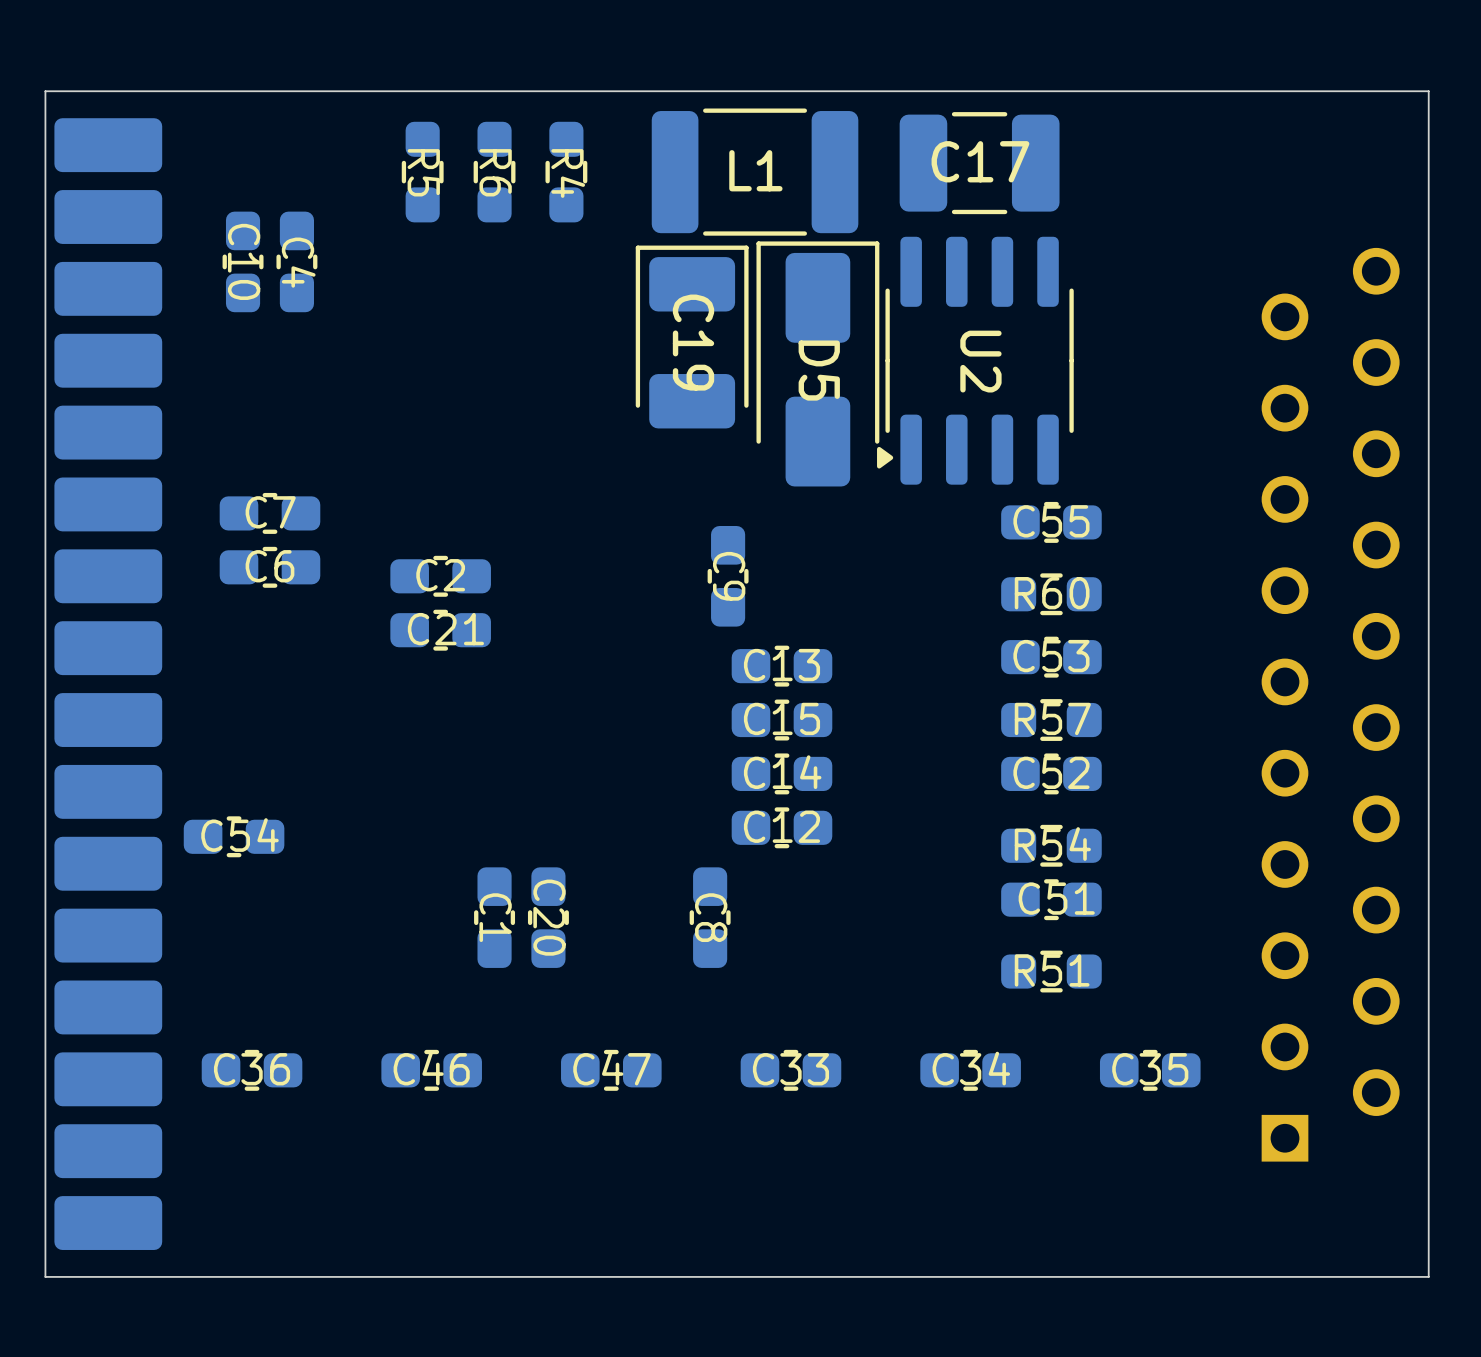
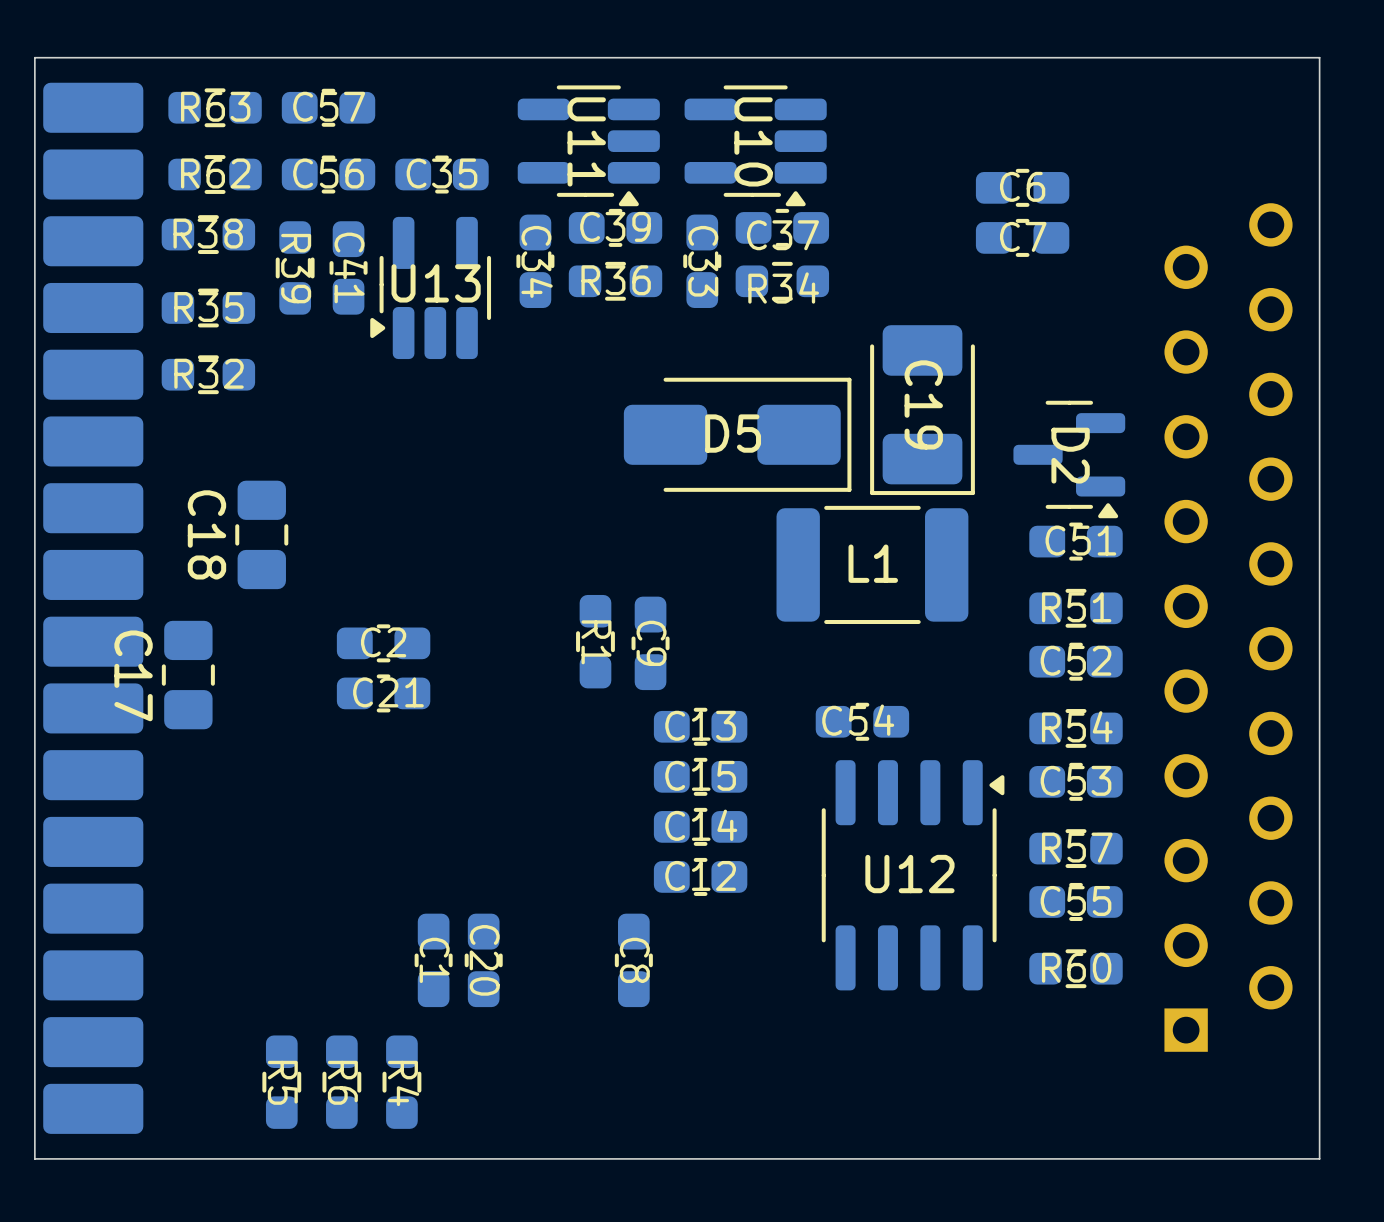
C17 footprint: [899, 112, 1060, 215] -> [161, 620, 215, 730]
R63: none -> (215, 107)
C57: none -> (328, 107)
R5 position: (422, 172) -> (281, 1082)
R6 position: (494, 172) -> (341, 1082)
R4 position: (566, 172) -> (401, 1082)
L1 position: (755, 172) -> (872, 564)
U11: none -> (588, 145)
U10: none -> (755, 145)
R62: none -> (215, 174)
C56: none -> (328, 174)
C10: (243, 261) -> none
C4: (296, 261) -> none
C39: none -> (615, 227)
C37: none -> (782, 227)
R38: none -> (208, 234)
R39: none -> (295, 267)
C41: none -> (348, 267)
R36: none -> (615, 281)
R34: none -> (782, 281)
C19 rotation: 0° (692, 337) -> 180° (922, 410)
C19 position: (692, 337) -> (922, 410)
U13: none -> (430, 287)
R35: none -> (208, 307)
U2: (975, 360) -> none
D5 rotation: 0° (817, 363) -> 90° clockwise (737, 434)
R32: none -> (208, 374)
C7 position: (269, 513) -> (1022, 237)
C55 position: (1051, 522) -> (1076, 901)
D2: none -> (1069, 459)
C6 position: (269, 567) -> (1022, 187)
C2 position: (440, 576) -> (383, 643)
C9 position: (728, 576) -> (650, 643)
R60 position: (1051, 594) -> (1076, 968)
C18: none -> (261, 534)
C21 position: (440, 630) -> (383, 693)
C53 position: (1051, 657) -> (1076, 781)
C13 position: (781, 666) -> (700, 726)
R1: none -> (595, 641)
C15 position: (781, 720) -> (700, 776)
R57 position: (1051, 720) -> (1076, 848)
C14 position: (781, 773) -> (700, 826)
C52 position: (1051, 773) -> (1076, 661)
C12 position: (781, 827) -> (700, 876)
C54 name position: C54 (239, 835) -> C54 (858, 720)
C54 position: (234, 836) -> (862, 721)
R54 position: (1051, 845) -> (1076, 728)
C51 position: (1051, 899) -> (1076, 541)
C1 position: (494, 917) -> (433, 960)
C20 position: (548, 917) -> (483, 960)
C8 position: (710, 917) -> (633, 960)
U12: none -> (913, 875)
R51 position: (1051, 971) -> (1076, 608)
C36: (252, 1070) -> none
C46: (431, 1070) -> none
C47: (611, 1070) -> none
C33 rotation: 0° (790, 1070) -> 90° clockwise (702, 261)
C33 position: (790, 1070) -> (702, 261)
C34 rotation: 0° (970, 1070) -> 90° clockwise (535, 261)
C34 position: (970, 1070) -> (535, 261)
C35 position: (1150, 1070) -> (441, 174)

